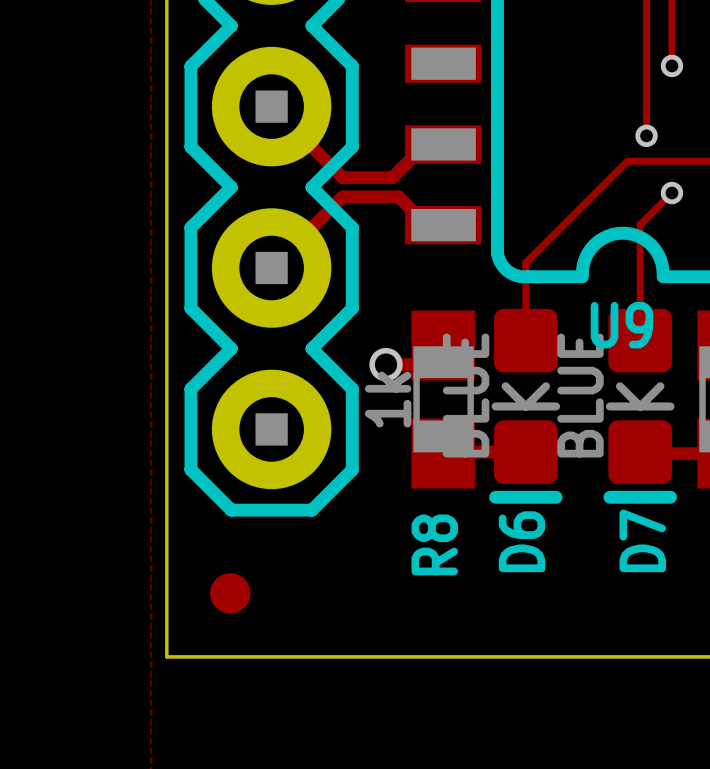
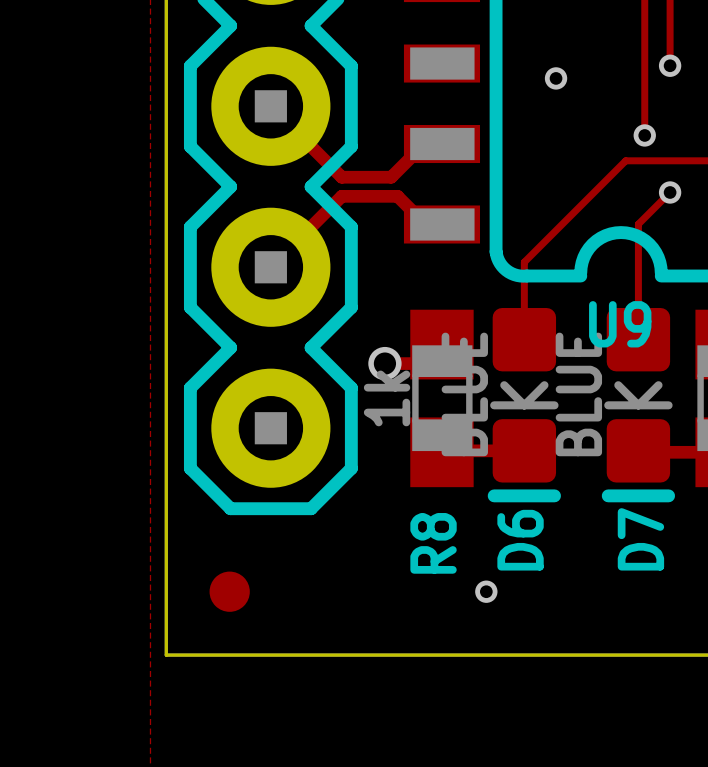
via: none -> (556, 78)
via: none -> (486, 591)

